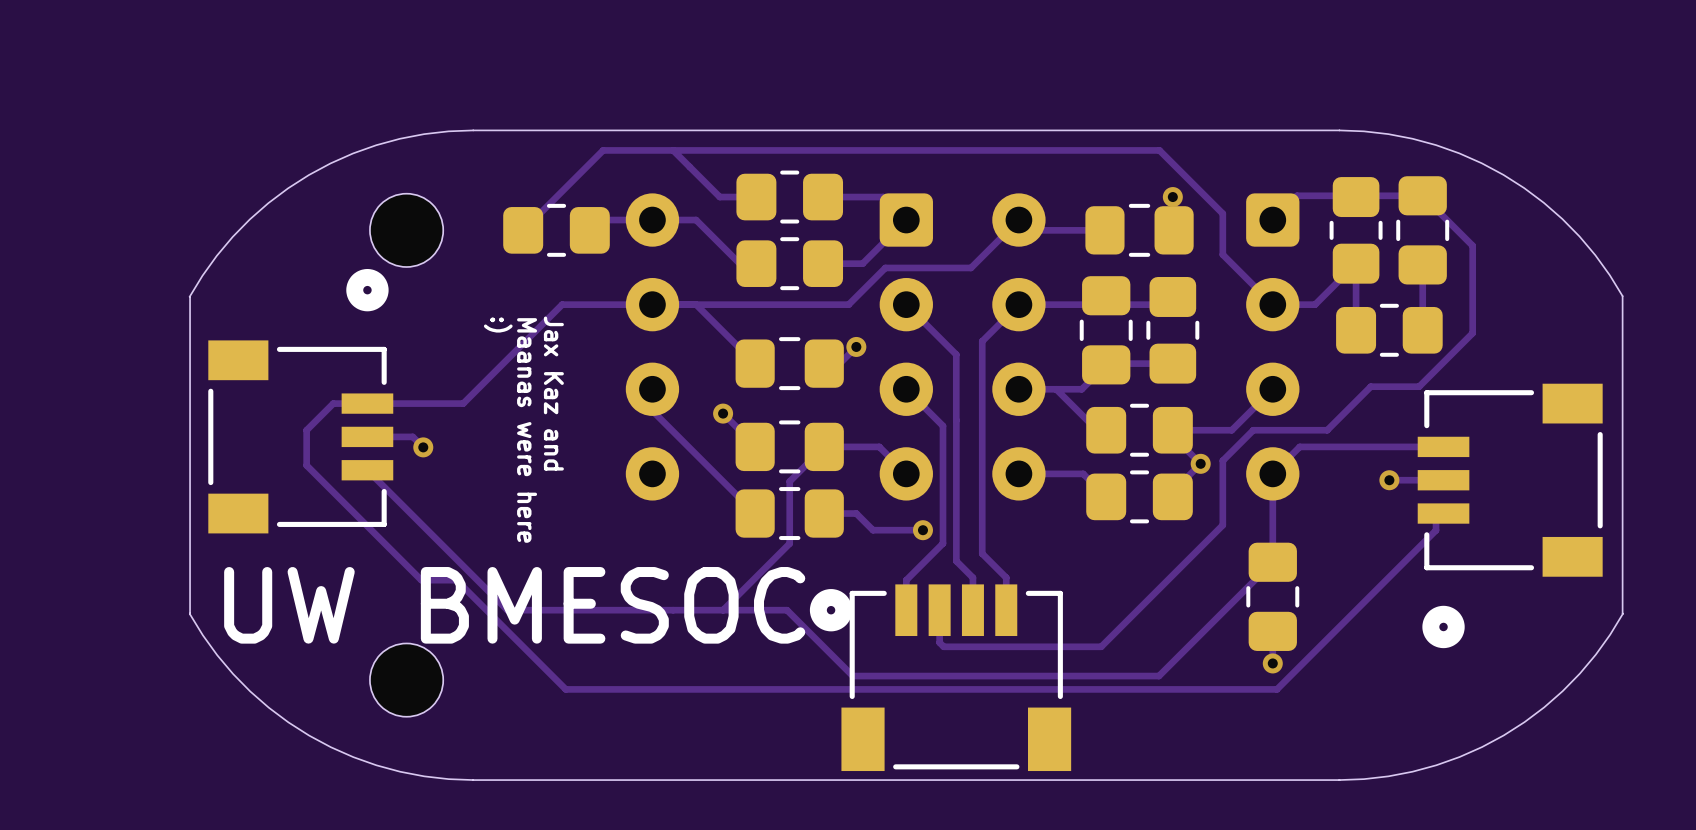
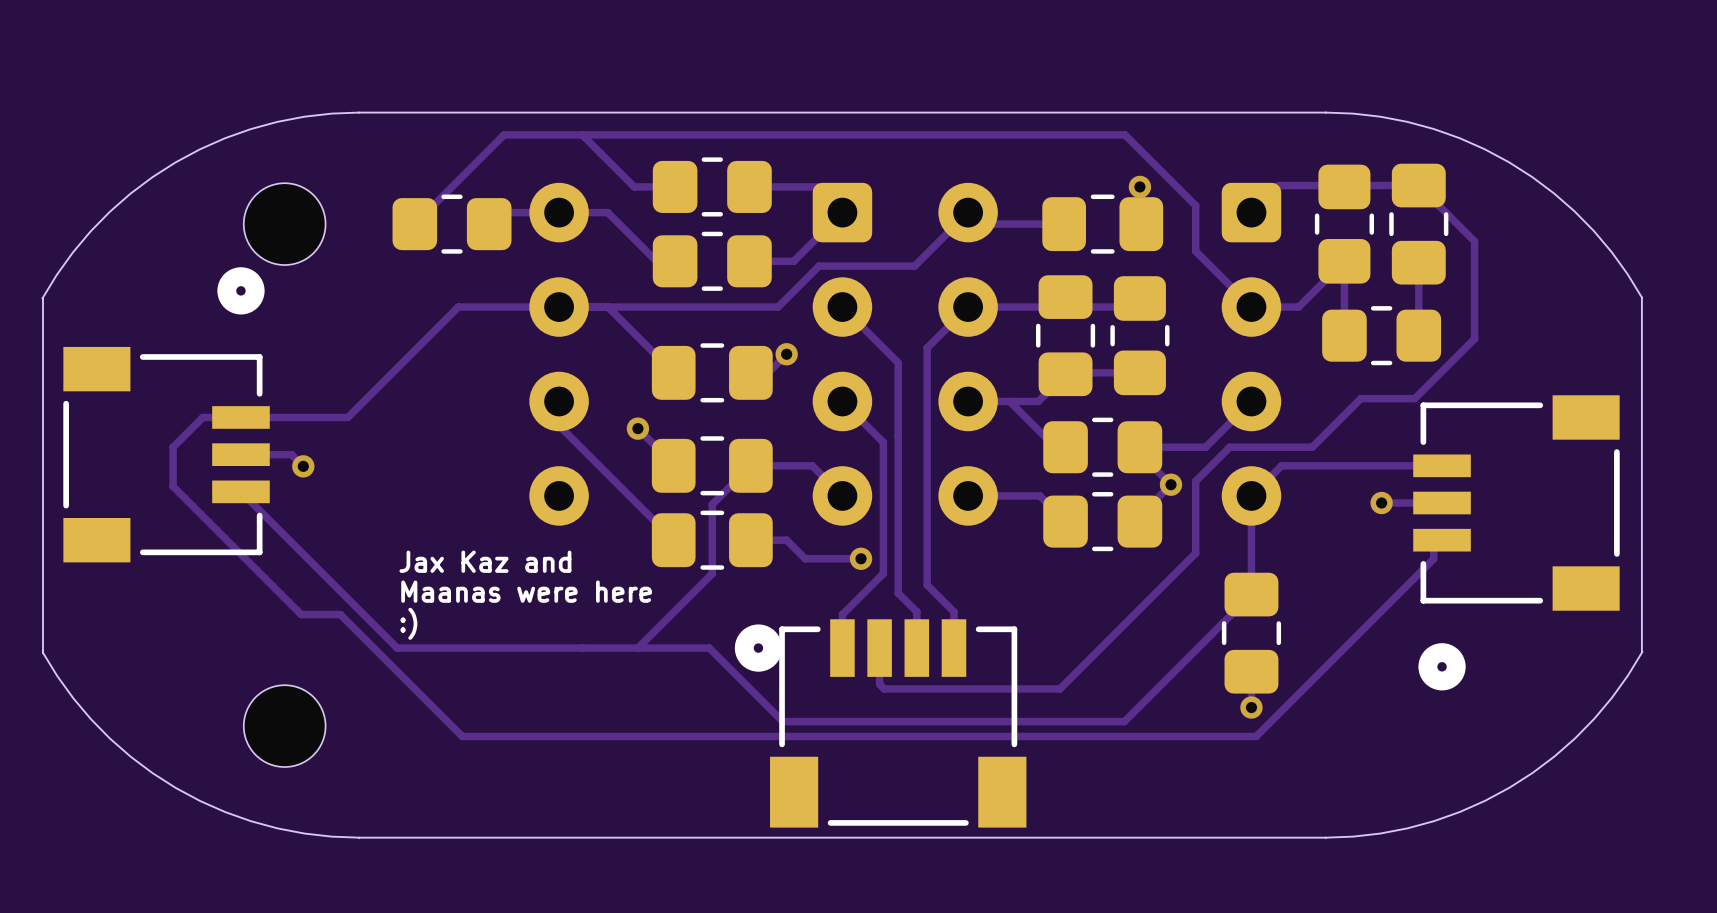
text rotation: 0° (498, 324) -> 90° counterclockwise (408, 623)
text position: :) (498, 324) -> :) (408, 623)
text rotation: 0° (553, 393) -> 90° counterclockwise (485, 561)
text rotation: 0° (527, 430) -> 90° counterclockwise (526, 591)
text: UW BMESOC (514, 605) -> none

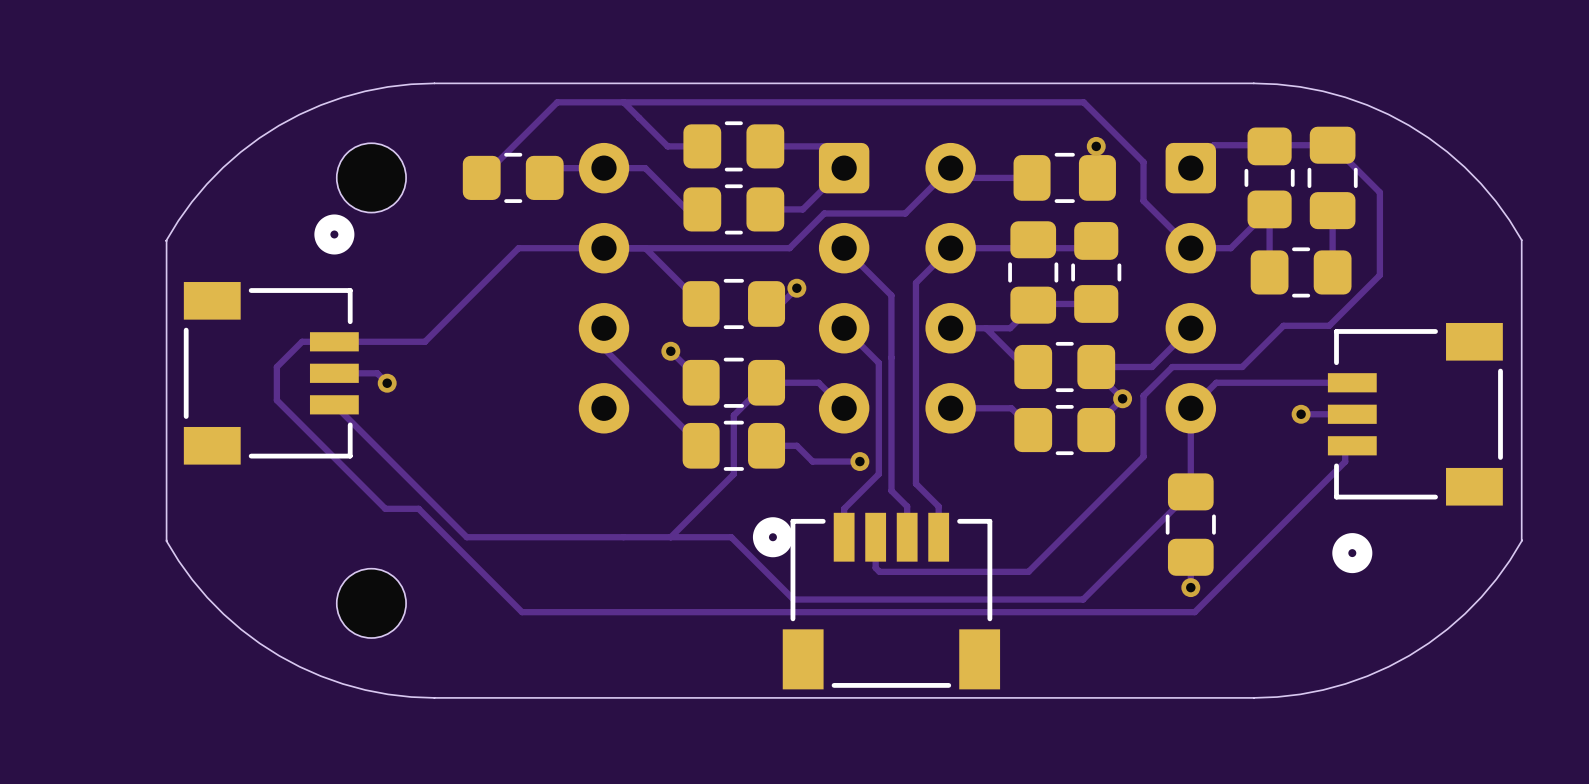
text: Jax Kaz and (485, 561) -> none
text: Maanas were here (526, 591) -> none
text: :) (408, 623) -> none

